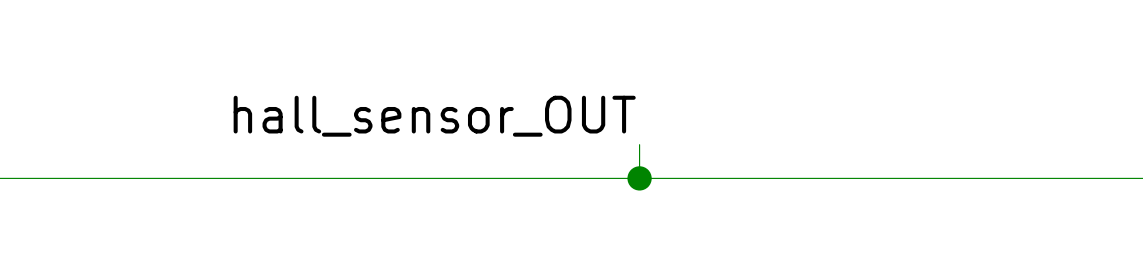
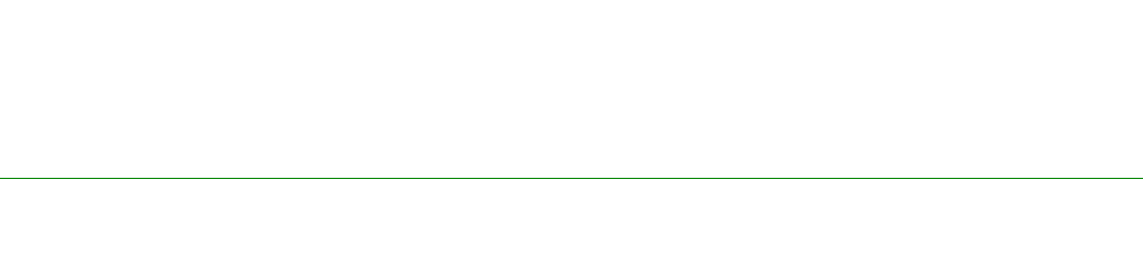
label: hall_sensor_OUT (434, 116) -> none
wire: (639, 144) (639, 178) -> none
junction: (639, 178) -> none

